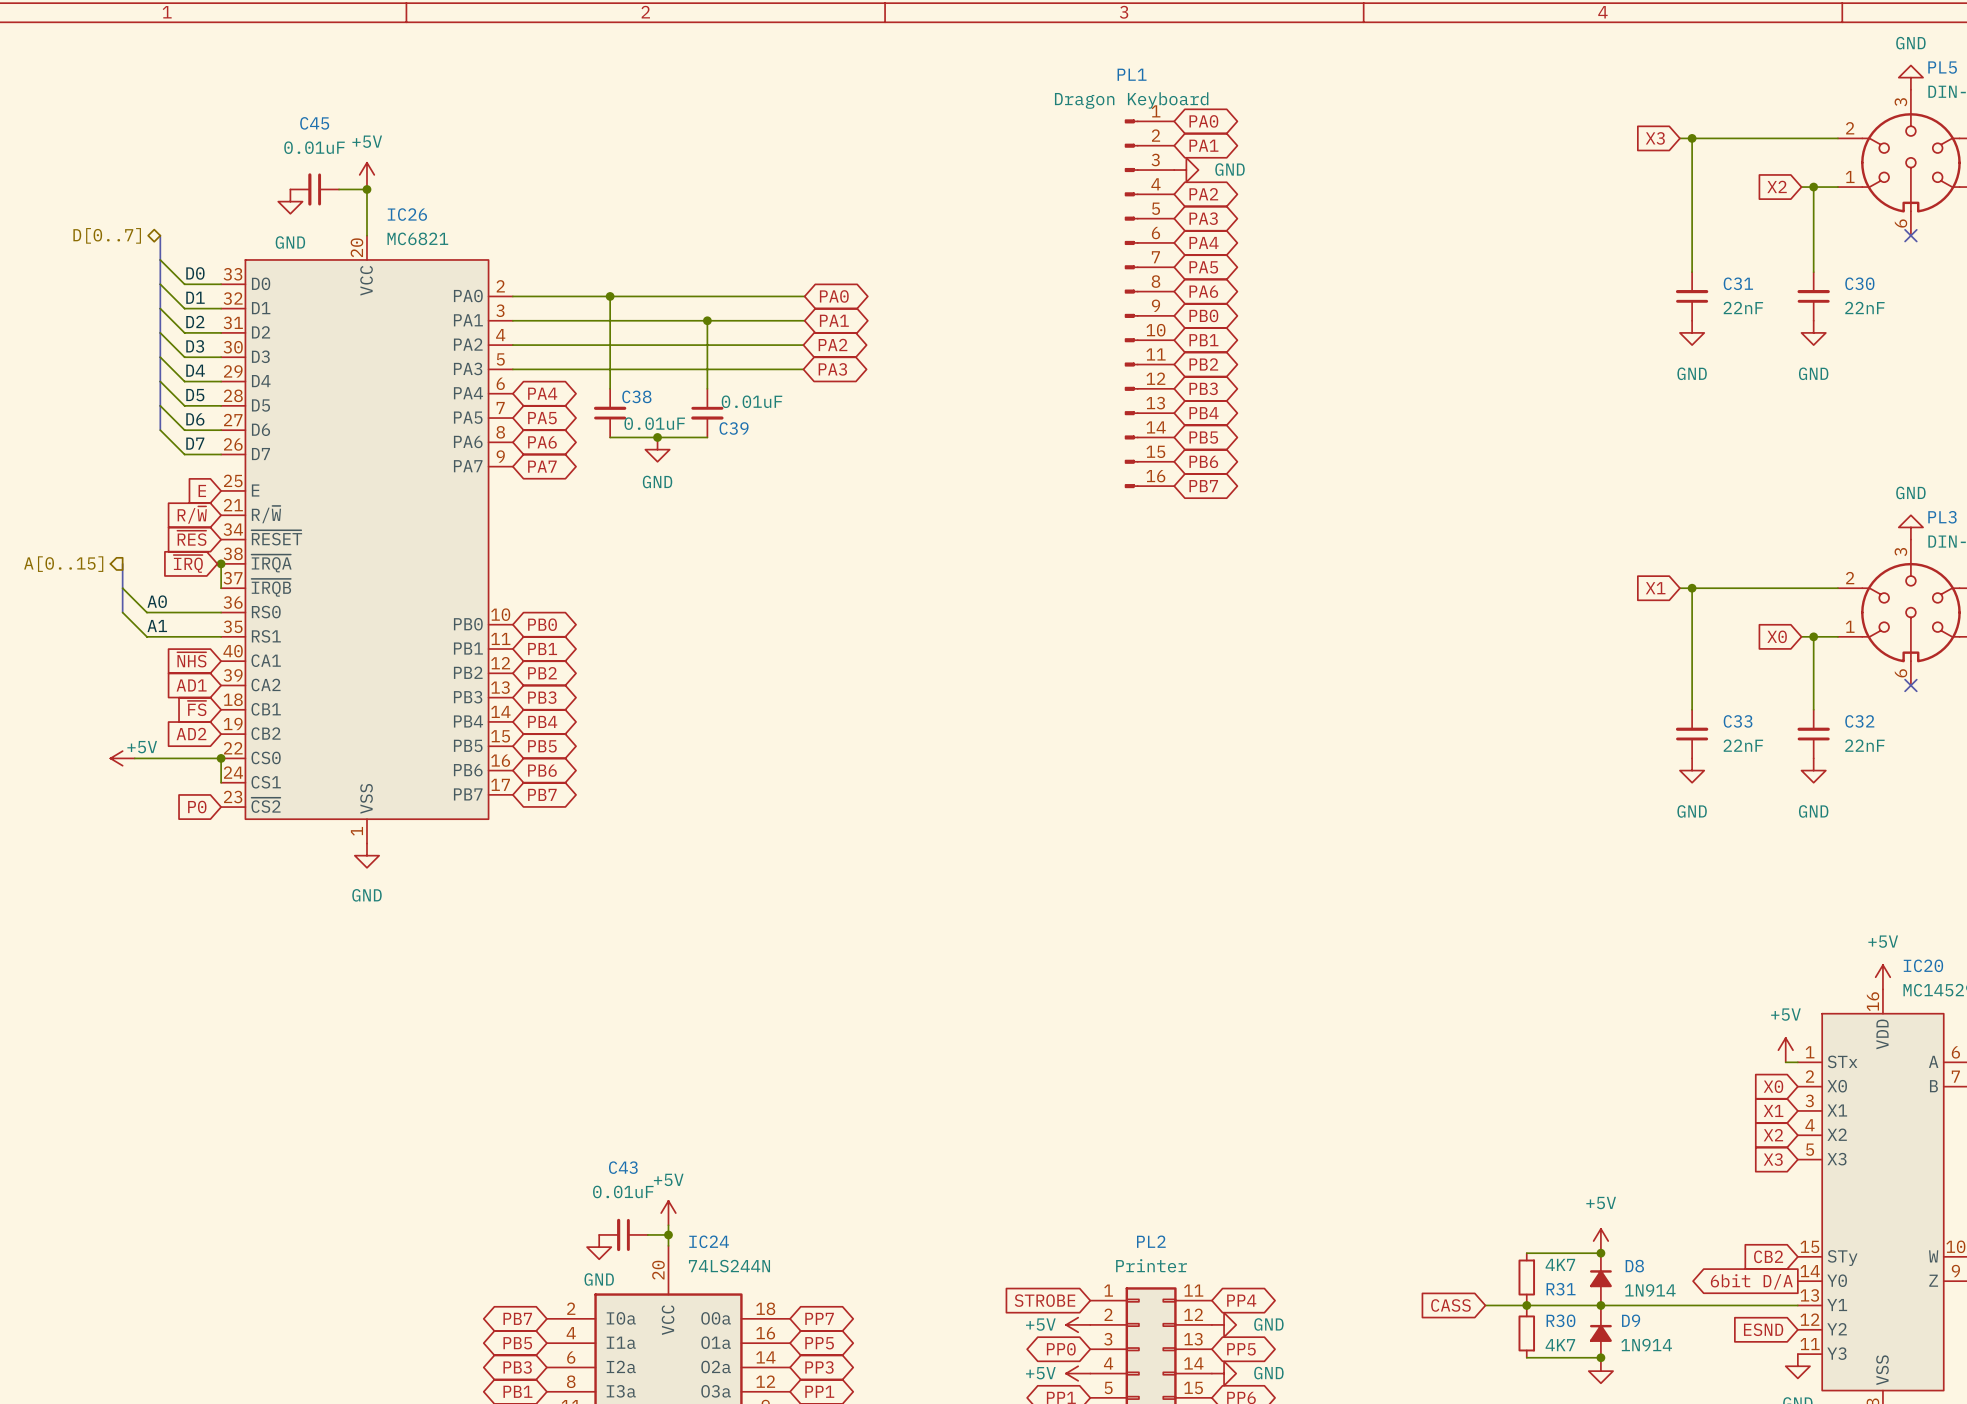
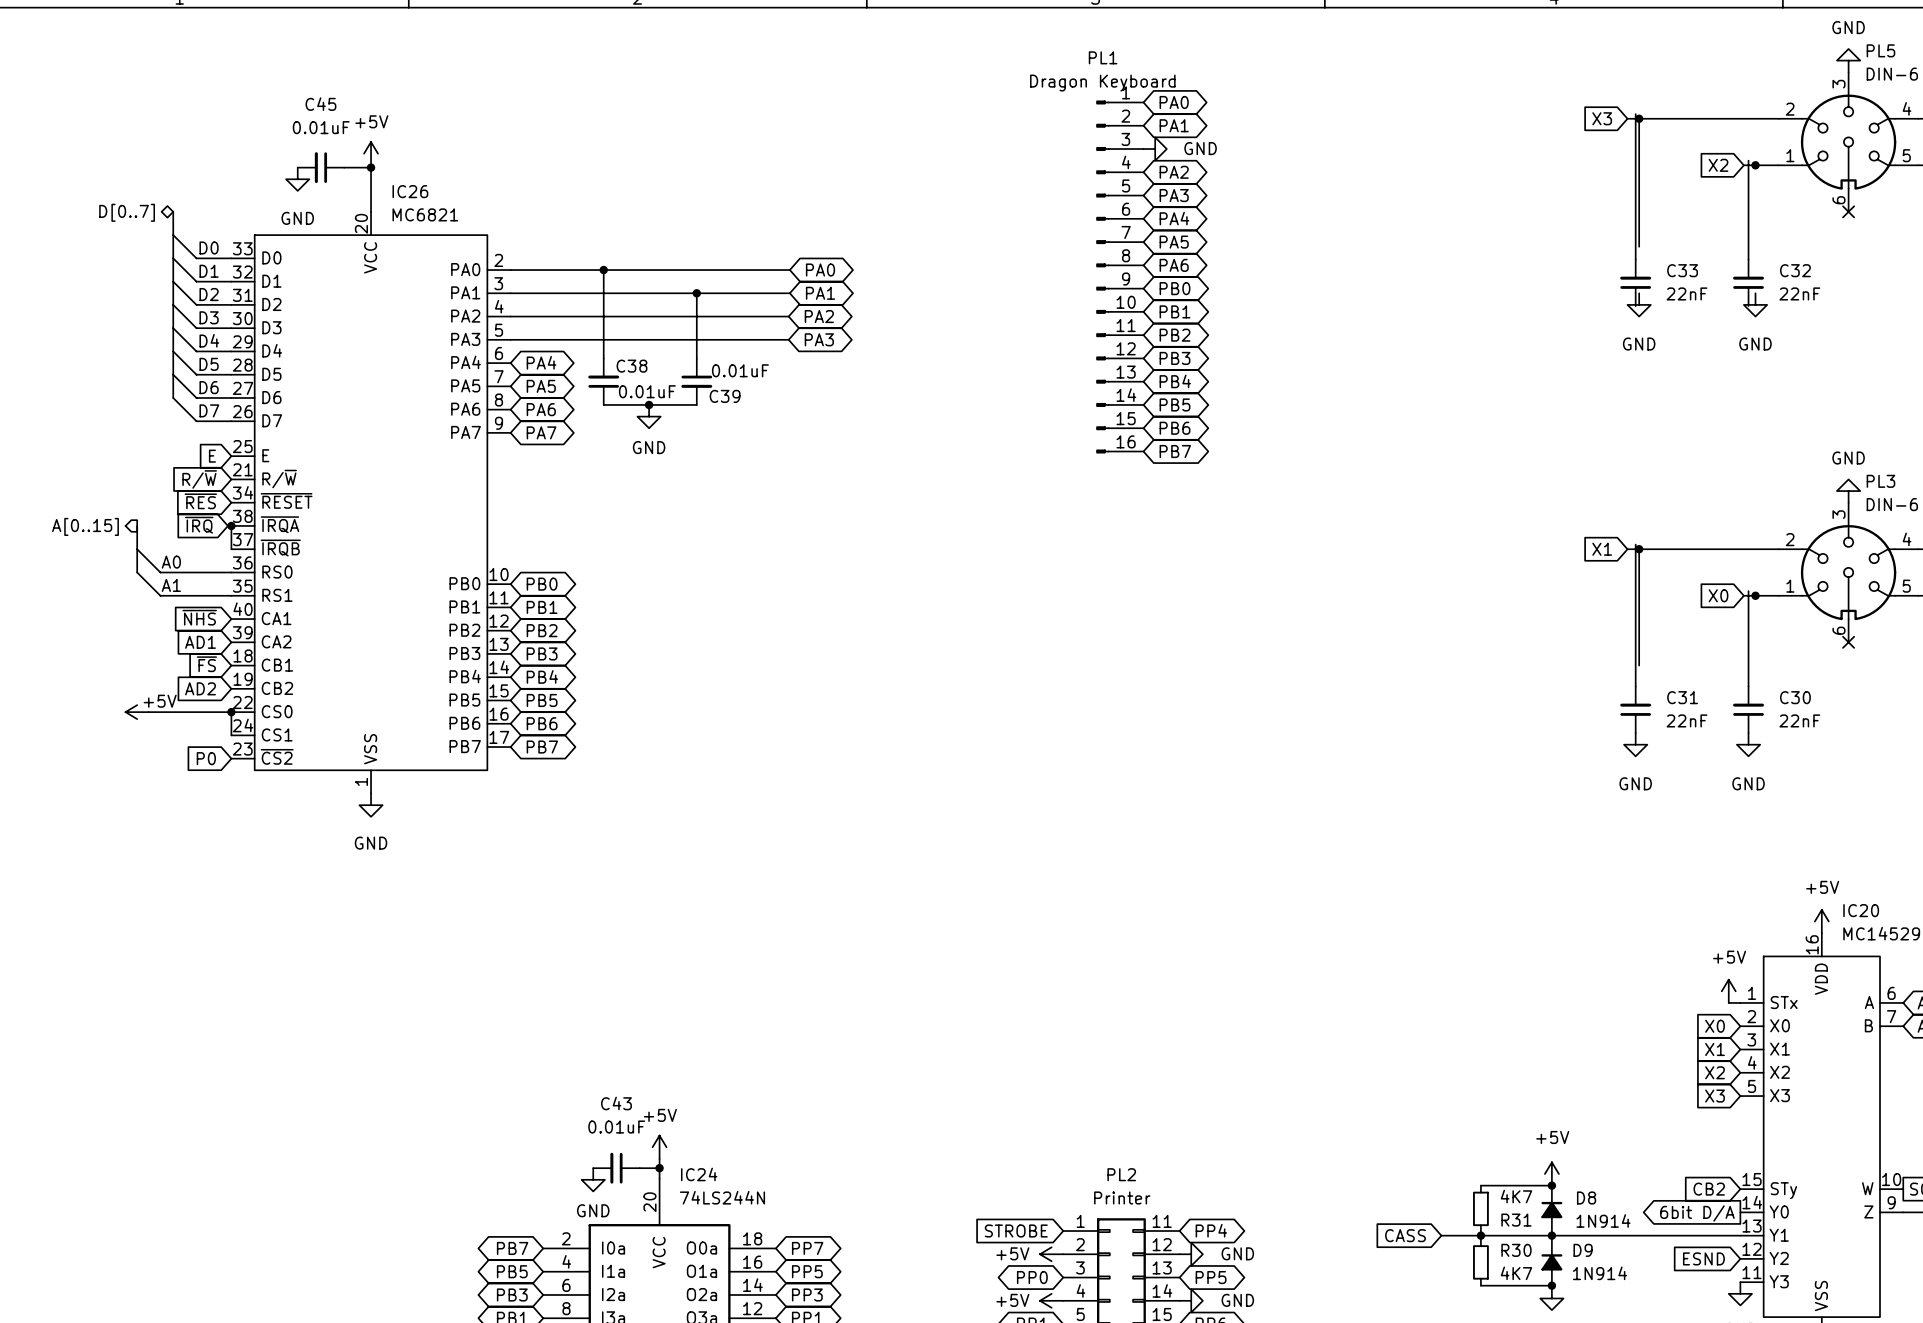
wire: none -> (1635, 114) (1635, 259)
wire: none -> (1748, 160) (1748, 259)
wire: (1813, 187) (1813, 272) -> none
C31 position: (1692, 296) -> (1635, 709)
C30 position: (1813, 296) -> (1748, 709)
wire: none -> (1635, 544) (1635, 686)
wire: none -> (1748, 591) (1748, 686)
wire: (1813, 636) (1813, 709) -> none
C33 position: (1692, 734) -> (1635, 282)
C32 position: (1813, 734) -> (1748, 282)
power symbol position: GND (1692, 770) -> GND (1635, 744)
power symbol position: GND (1813, 770) -> GND (1748, 744)

